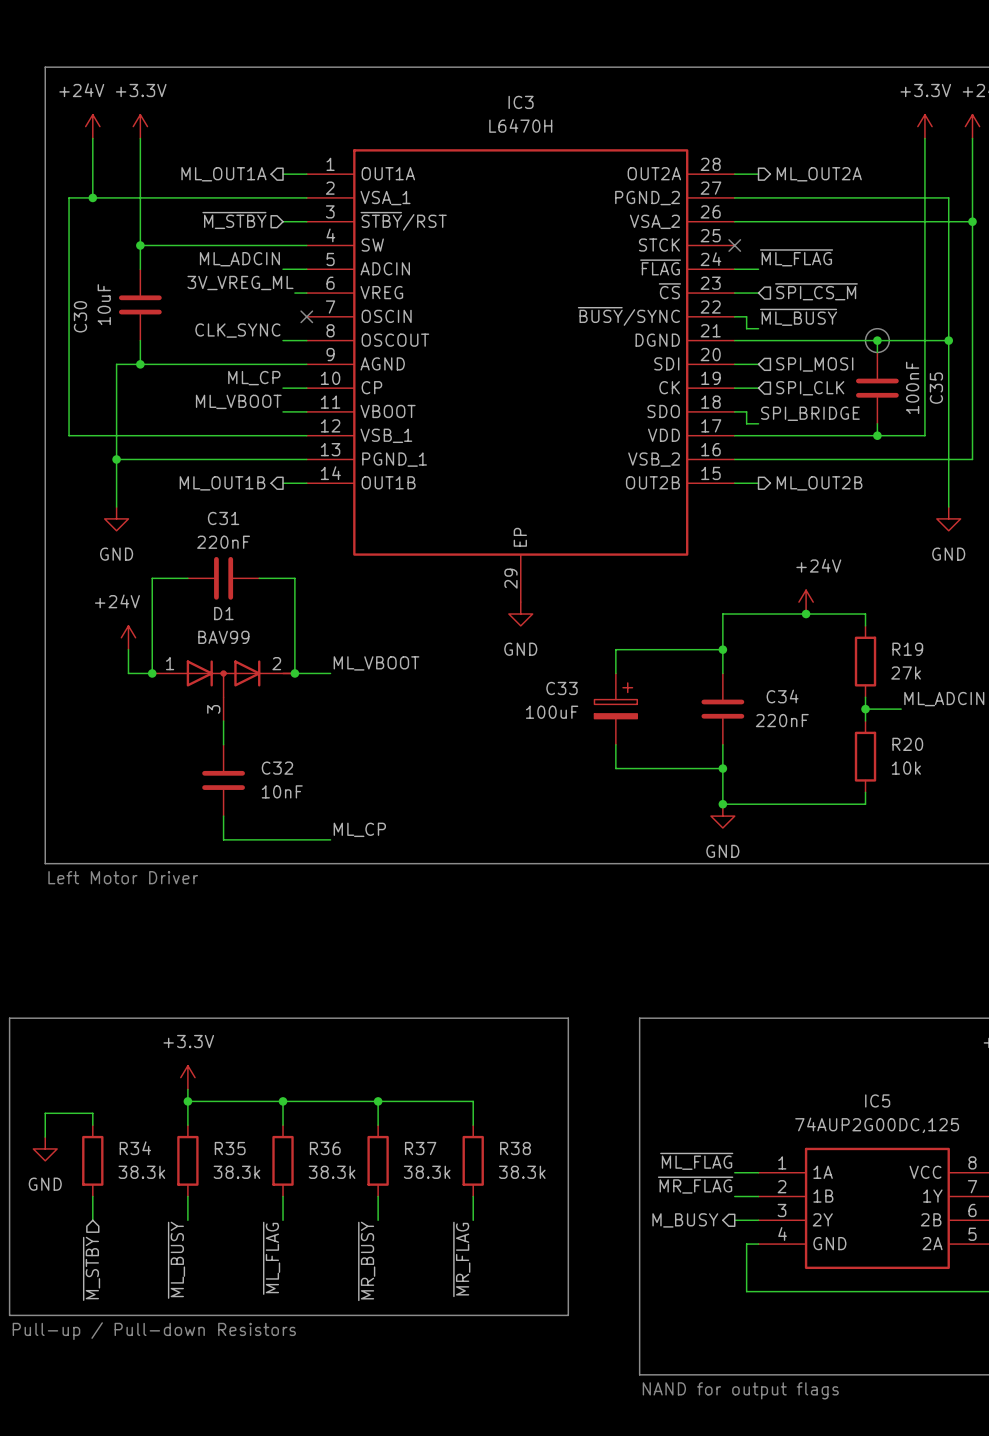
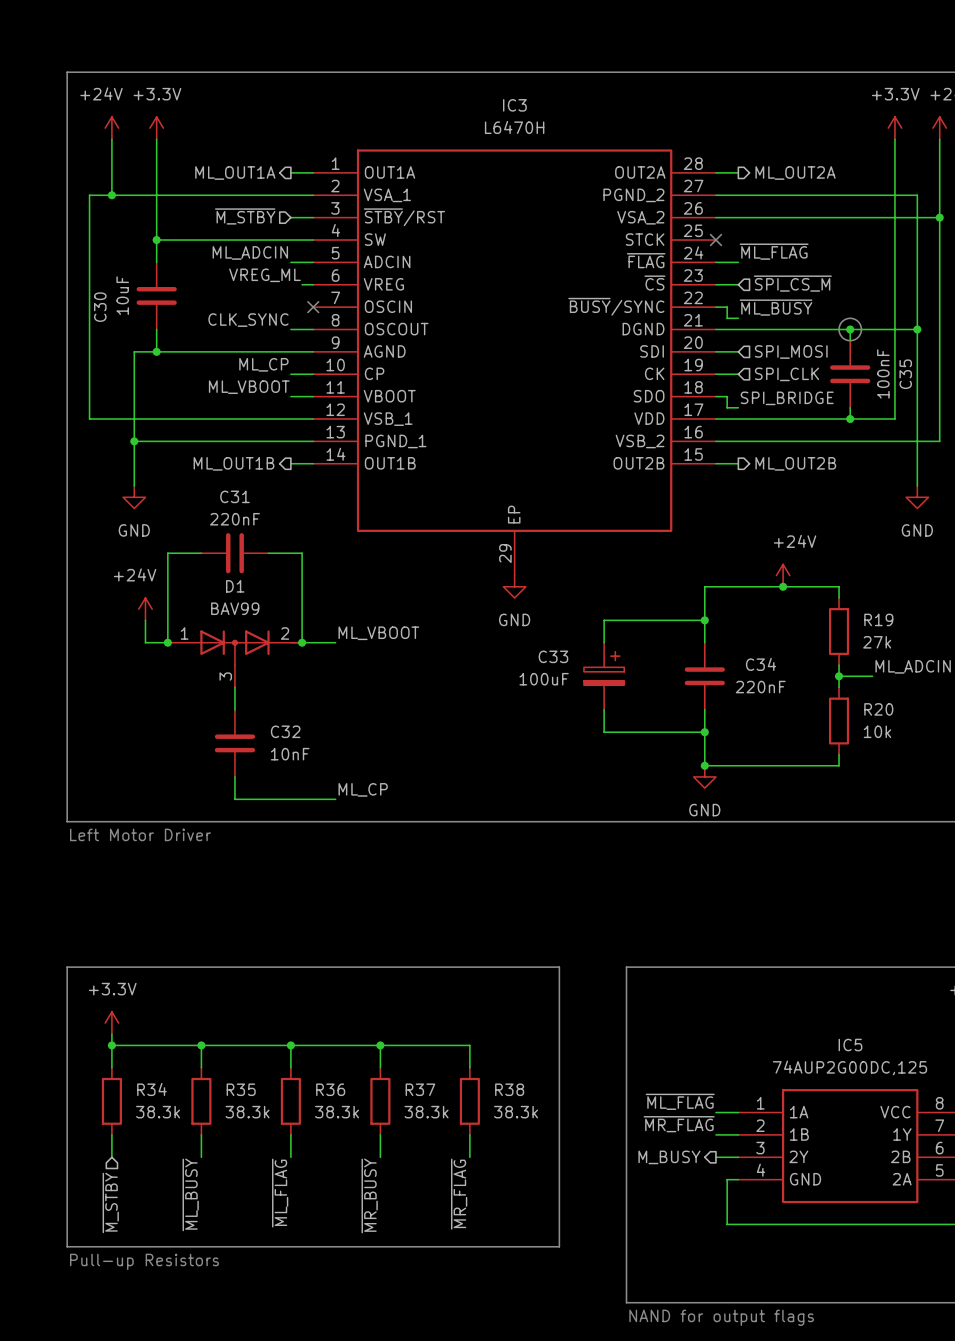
label: 3V_VREG_ML (240, 283) -> VREG_ML (264, 275)
line: (45, 1018) (9, 1018) (9, 1315) (45, 1315) -> (67, 967) (67, 1246)
power symbol position: +3.3V (187, 1077) -> +3.3V (111, 1023)
wire: (187, 1089) (187, 1101) -> (111, 1045) (201, 1045)
junction: none -> (111, 1045)
wire: (92, 1113) (45, 1113) (45, 1137) -> (111, 1056) (111, 1034)
power symbol: GND (45, 1148) -> none
text: Pull-up / Pull-down Resistors (154, 1331) -> Pull-up Resistors (144, 1261)

